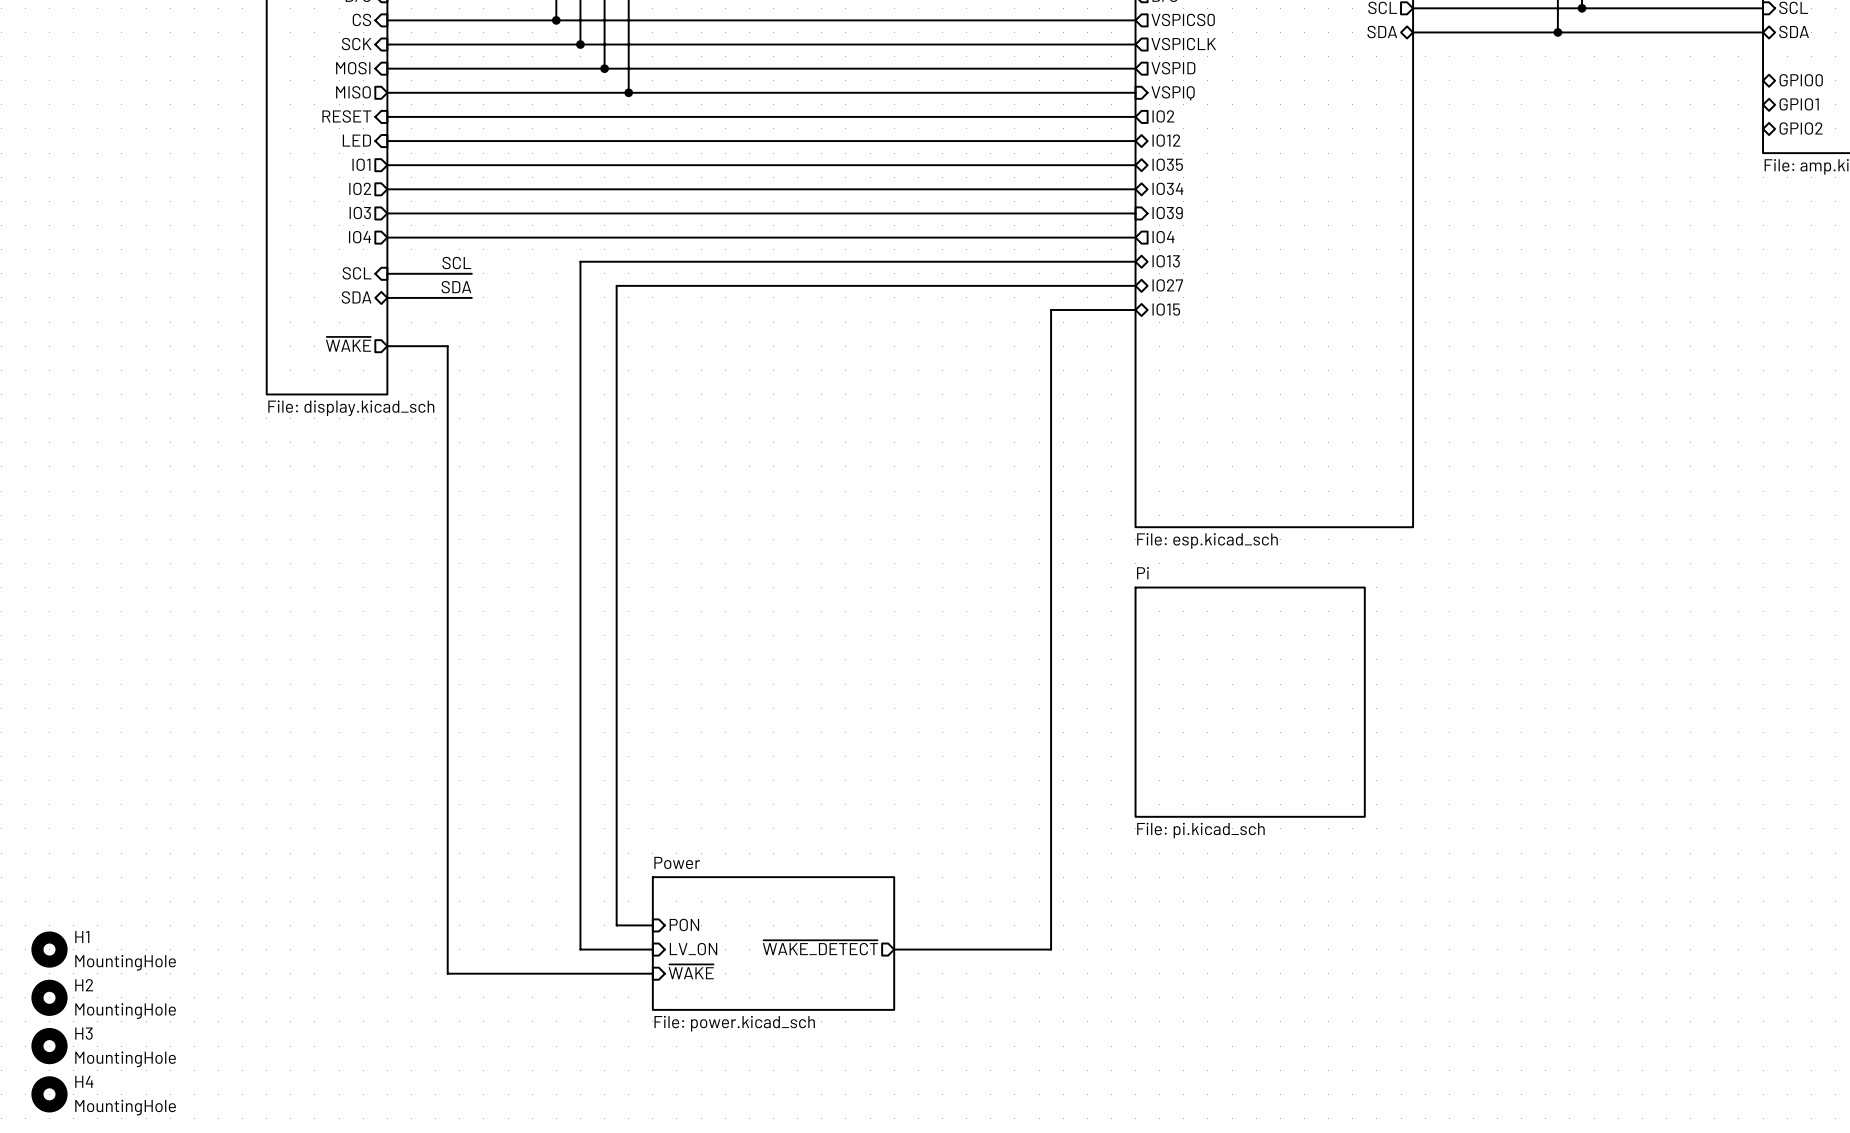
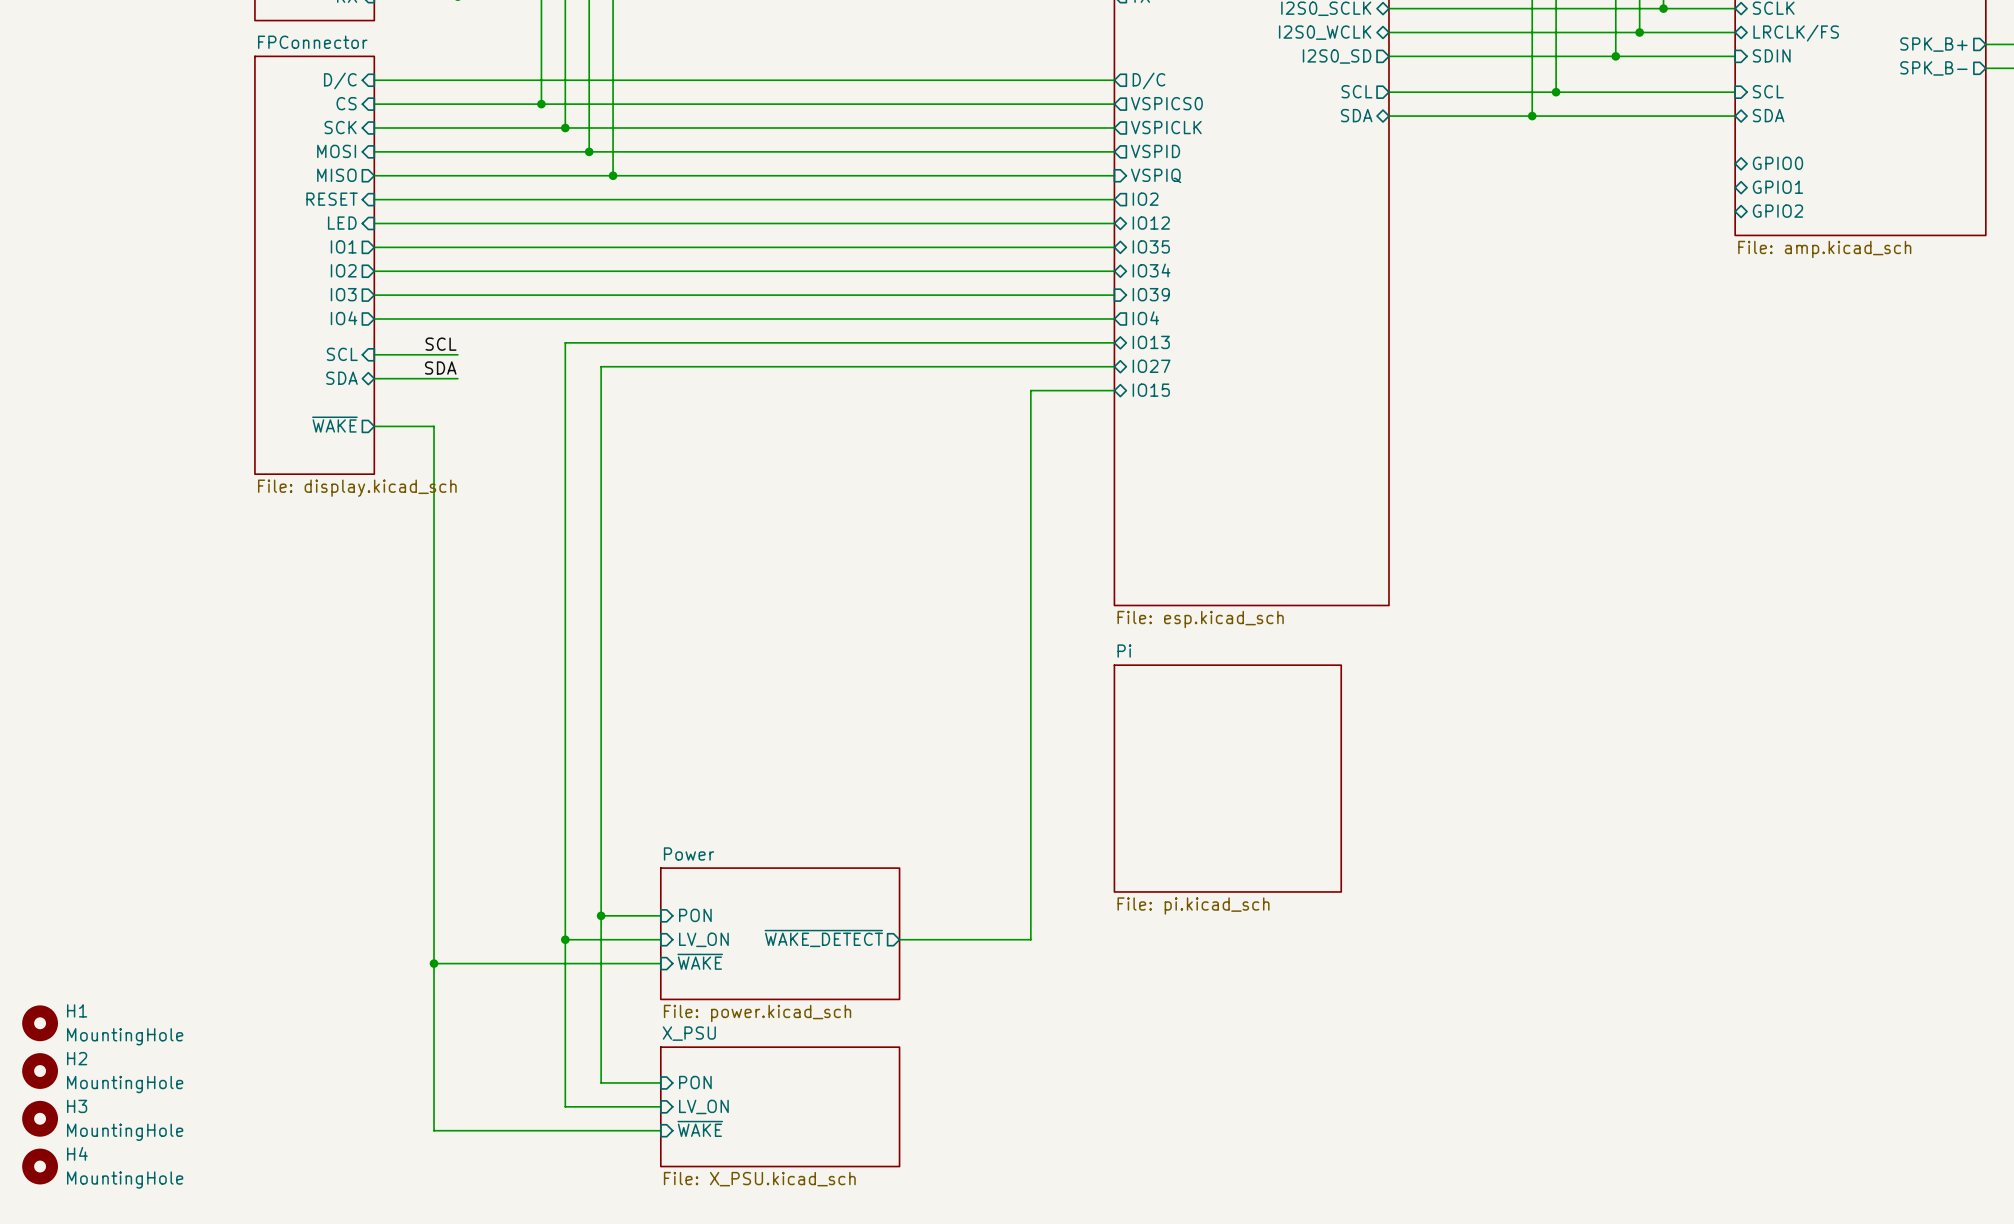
wire: none -> (601, 915) (660, 915)
junction: none -> (601, 915)
sheet pin: none -> PON (695, 915)
sheet pin: none -> LV_ON (703, 939)
wire: none -> (565, 939) (660, 939)
junction: none -> (565, 939)
wire: (1051, 865) (1051, 949) (894, 949) -> (1030, 939) (899, 939)
sheet pin: none -> ~{WAKE} (700, 961)
wire: none -> (434, 963) (660, 963)
junction: none -> (434, 963)
sheet pin: PON (684, 924) -> none
wire: (616, 925) (652, 925) -> (601, 999) (601, 1082) (660, 1082)
sheet Power position: (773, 943) -> (780, 933)
sheet pin position: ~{WAKE_DETECT} (820, 947) -> ~{WAKE_DETECT} (823, 938)
wire: (580, 949) (652, 949) -> (565, 1023) (565, 1106) (660, 1106)
sheet pin: LV_ON (693, 949) -> none
sheet pin: ~{WAKE} (691, 971) -> none
wire: (447, 973) (652, 973) -> (434, 1047) (434, 1130) (660, 1130)
sheet pin: none -> PON (695, 1082)
sheet pin: none -> LV_ON (703, 1106)
sheet X_PSU: none -> File: X_PSU.kicad_sch (780, 1106)
sheet pin: none -> ~{WAKE} (700, 1128)

